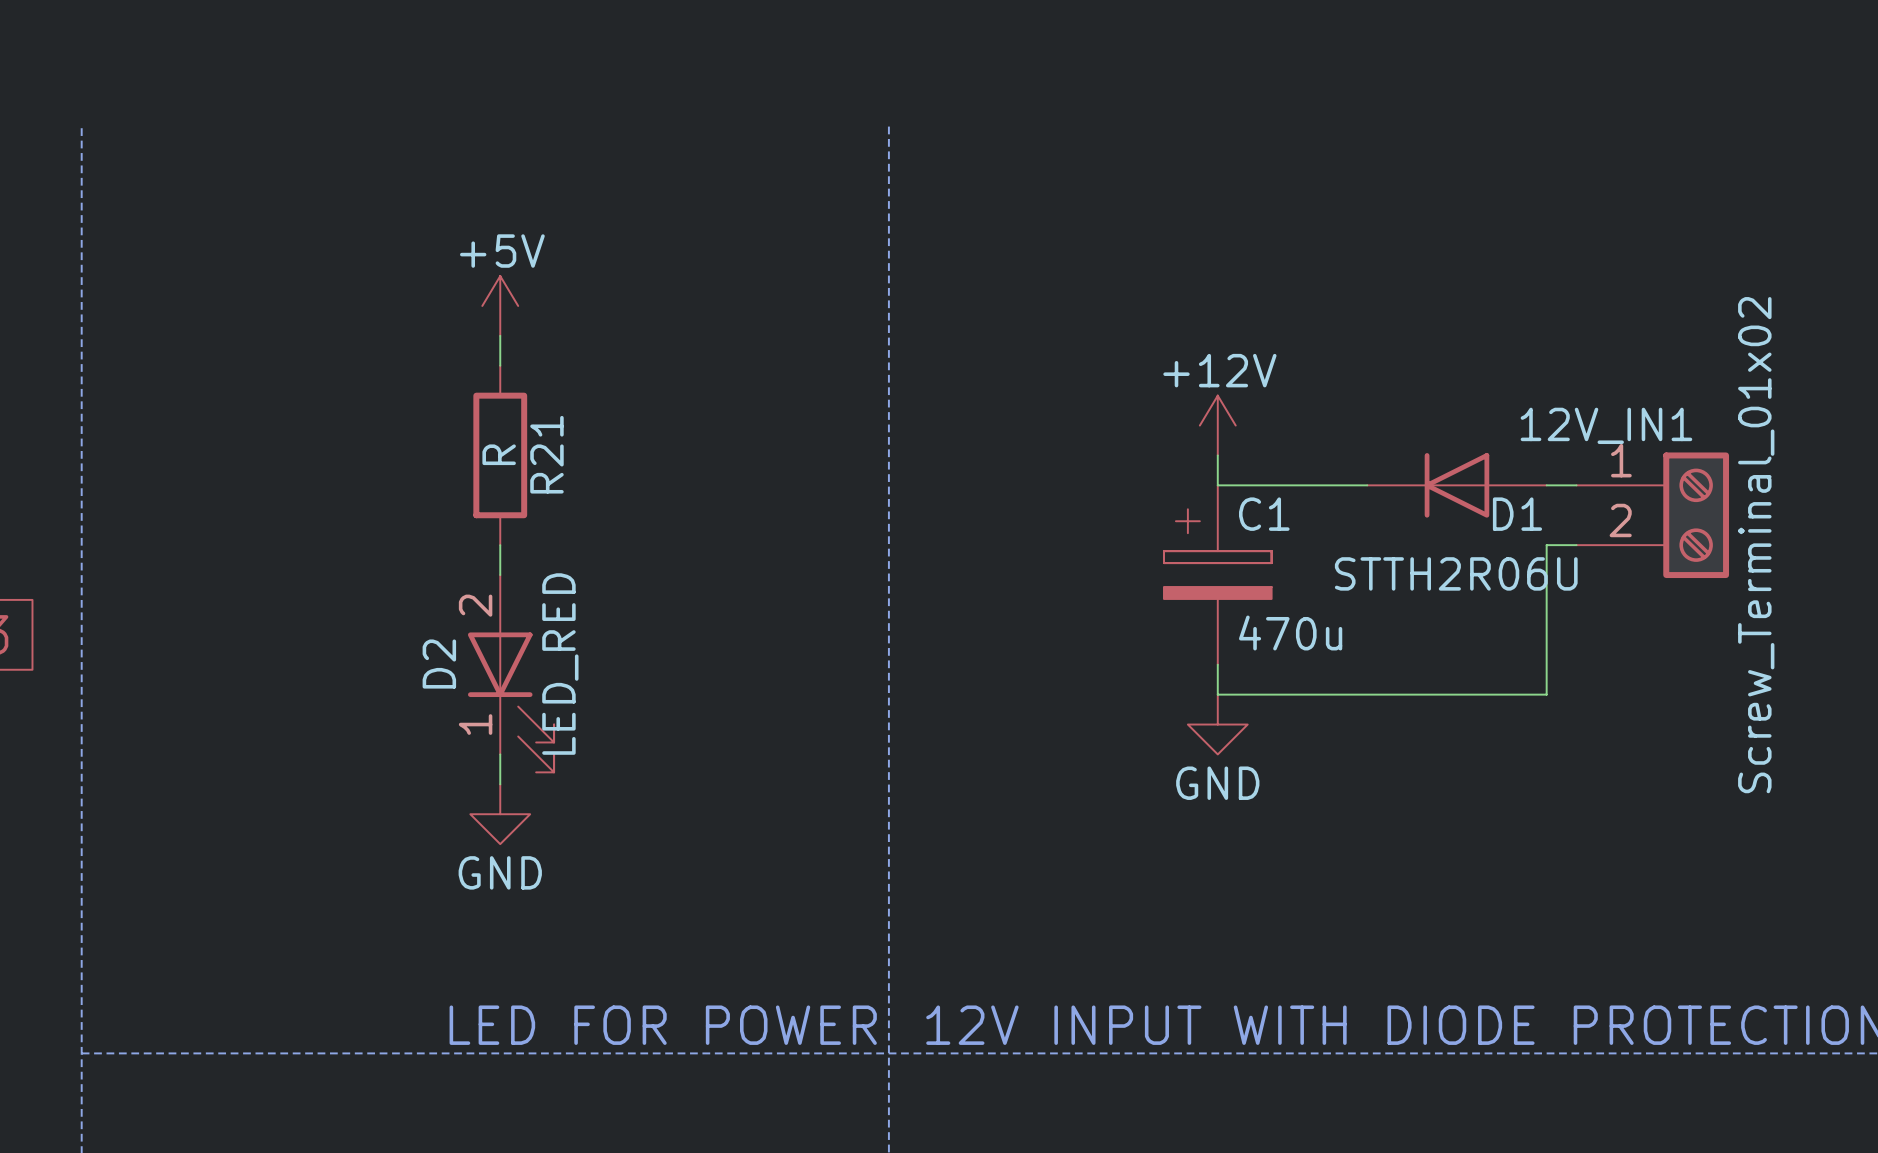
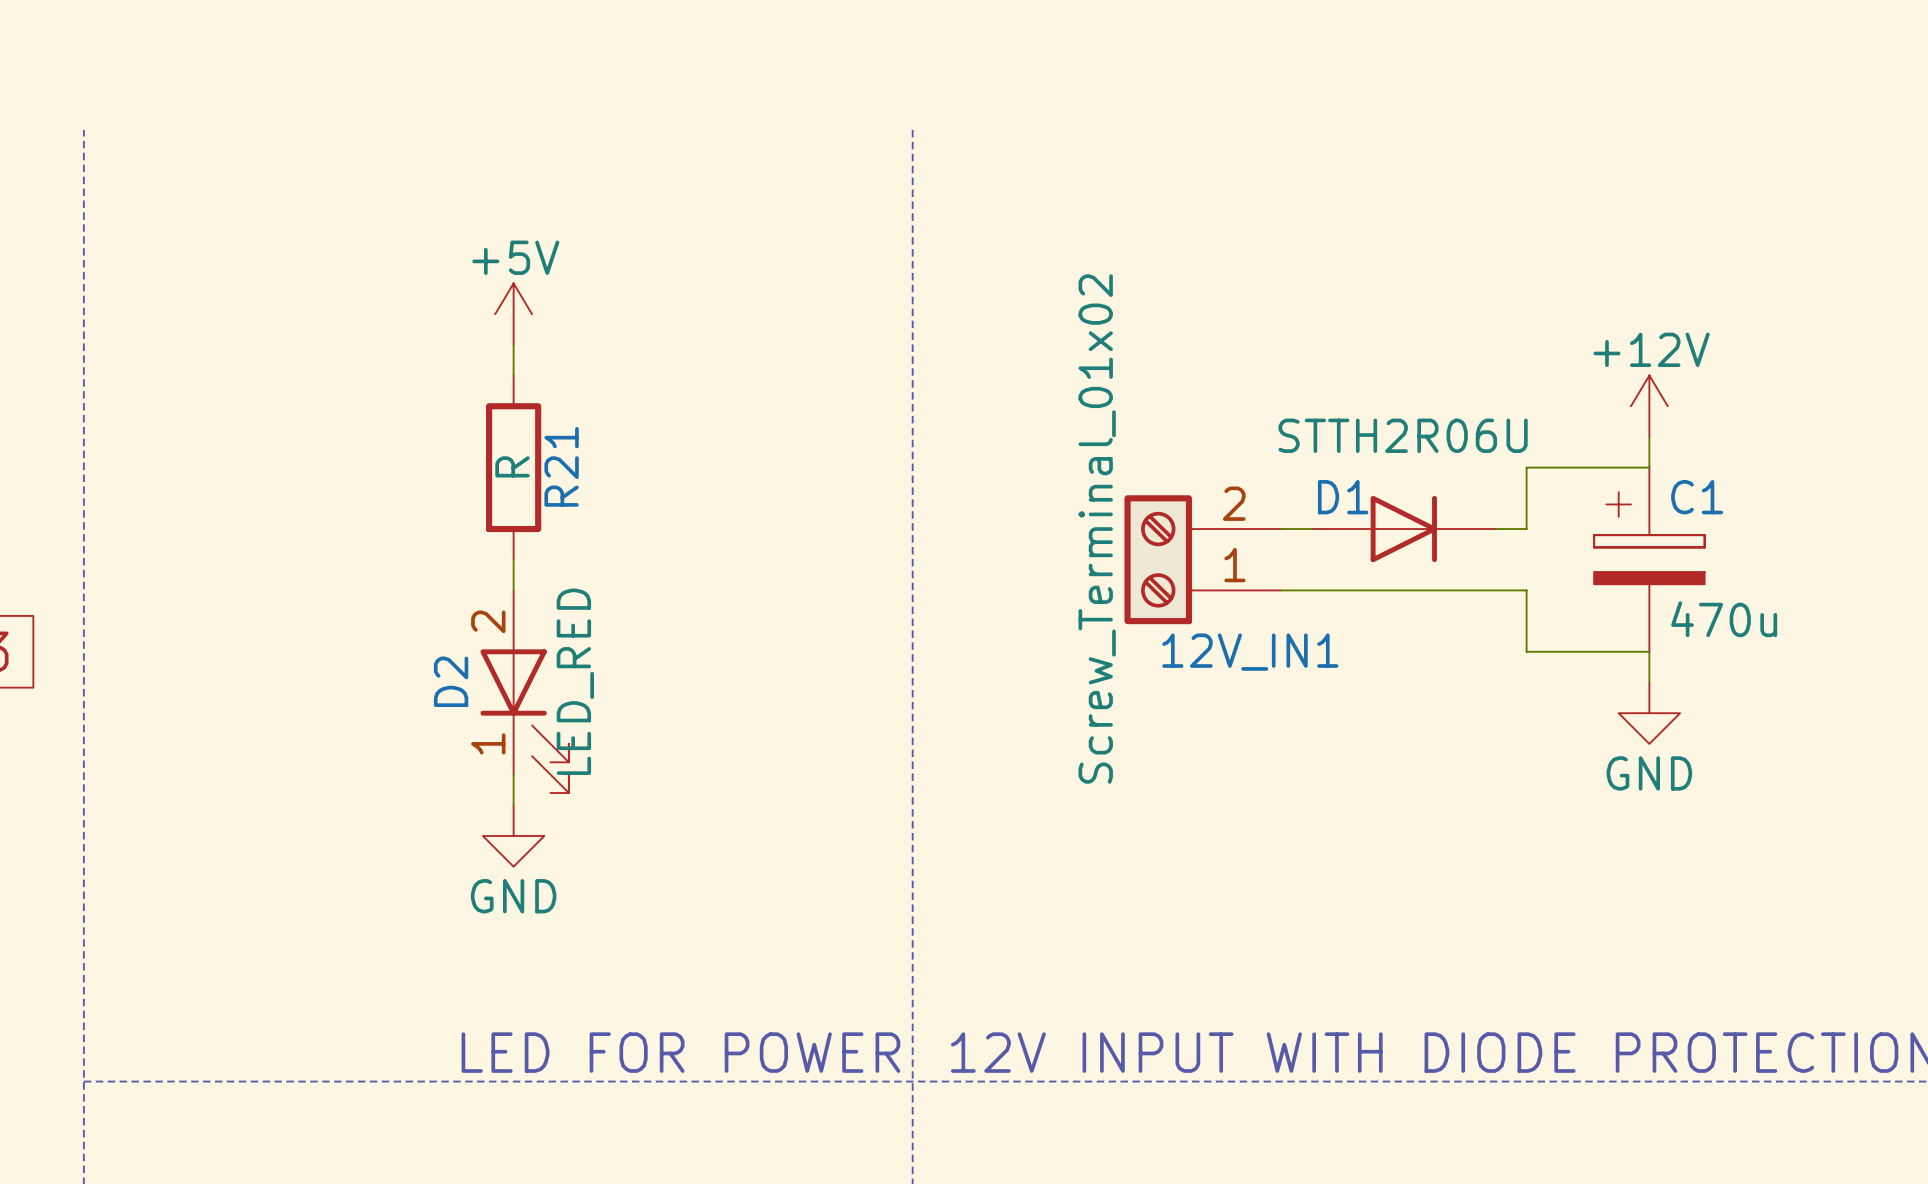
power symbol position: +12V (1217, 425) -> +12V (1649, 406)
wire: none -> (1649, 436) (1649, 467) (1526, 467) (1526, 529) (1495, 529)
wire: (1217, 455) (1217, 485) (1367, 485) -> none
D1 rotation: 0° (1456, 485) -> 180° (1403, 529)
wire: (1546, 485) (1576, 485) -> (1281, 529) (1311, 529)
12V_IN1 position: (1652, 515) -> (1202, 559)
12V_IN1 rotation: 0° (1696, 515) -> 180° (1158, 559)
wire: (1576, 545) (1546, 545) (1546, 694) (1217, 694) (1217, 664) -> none
C1 position: (1217, 575) -> (1649, 559)
wire: none -> (1281, 590) (1526, 590) (1526, 651) (1649, 651) (1649, 682)
power symbol position: GND (1217, 724) -> GND (1649, 713)

